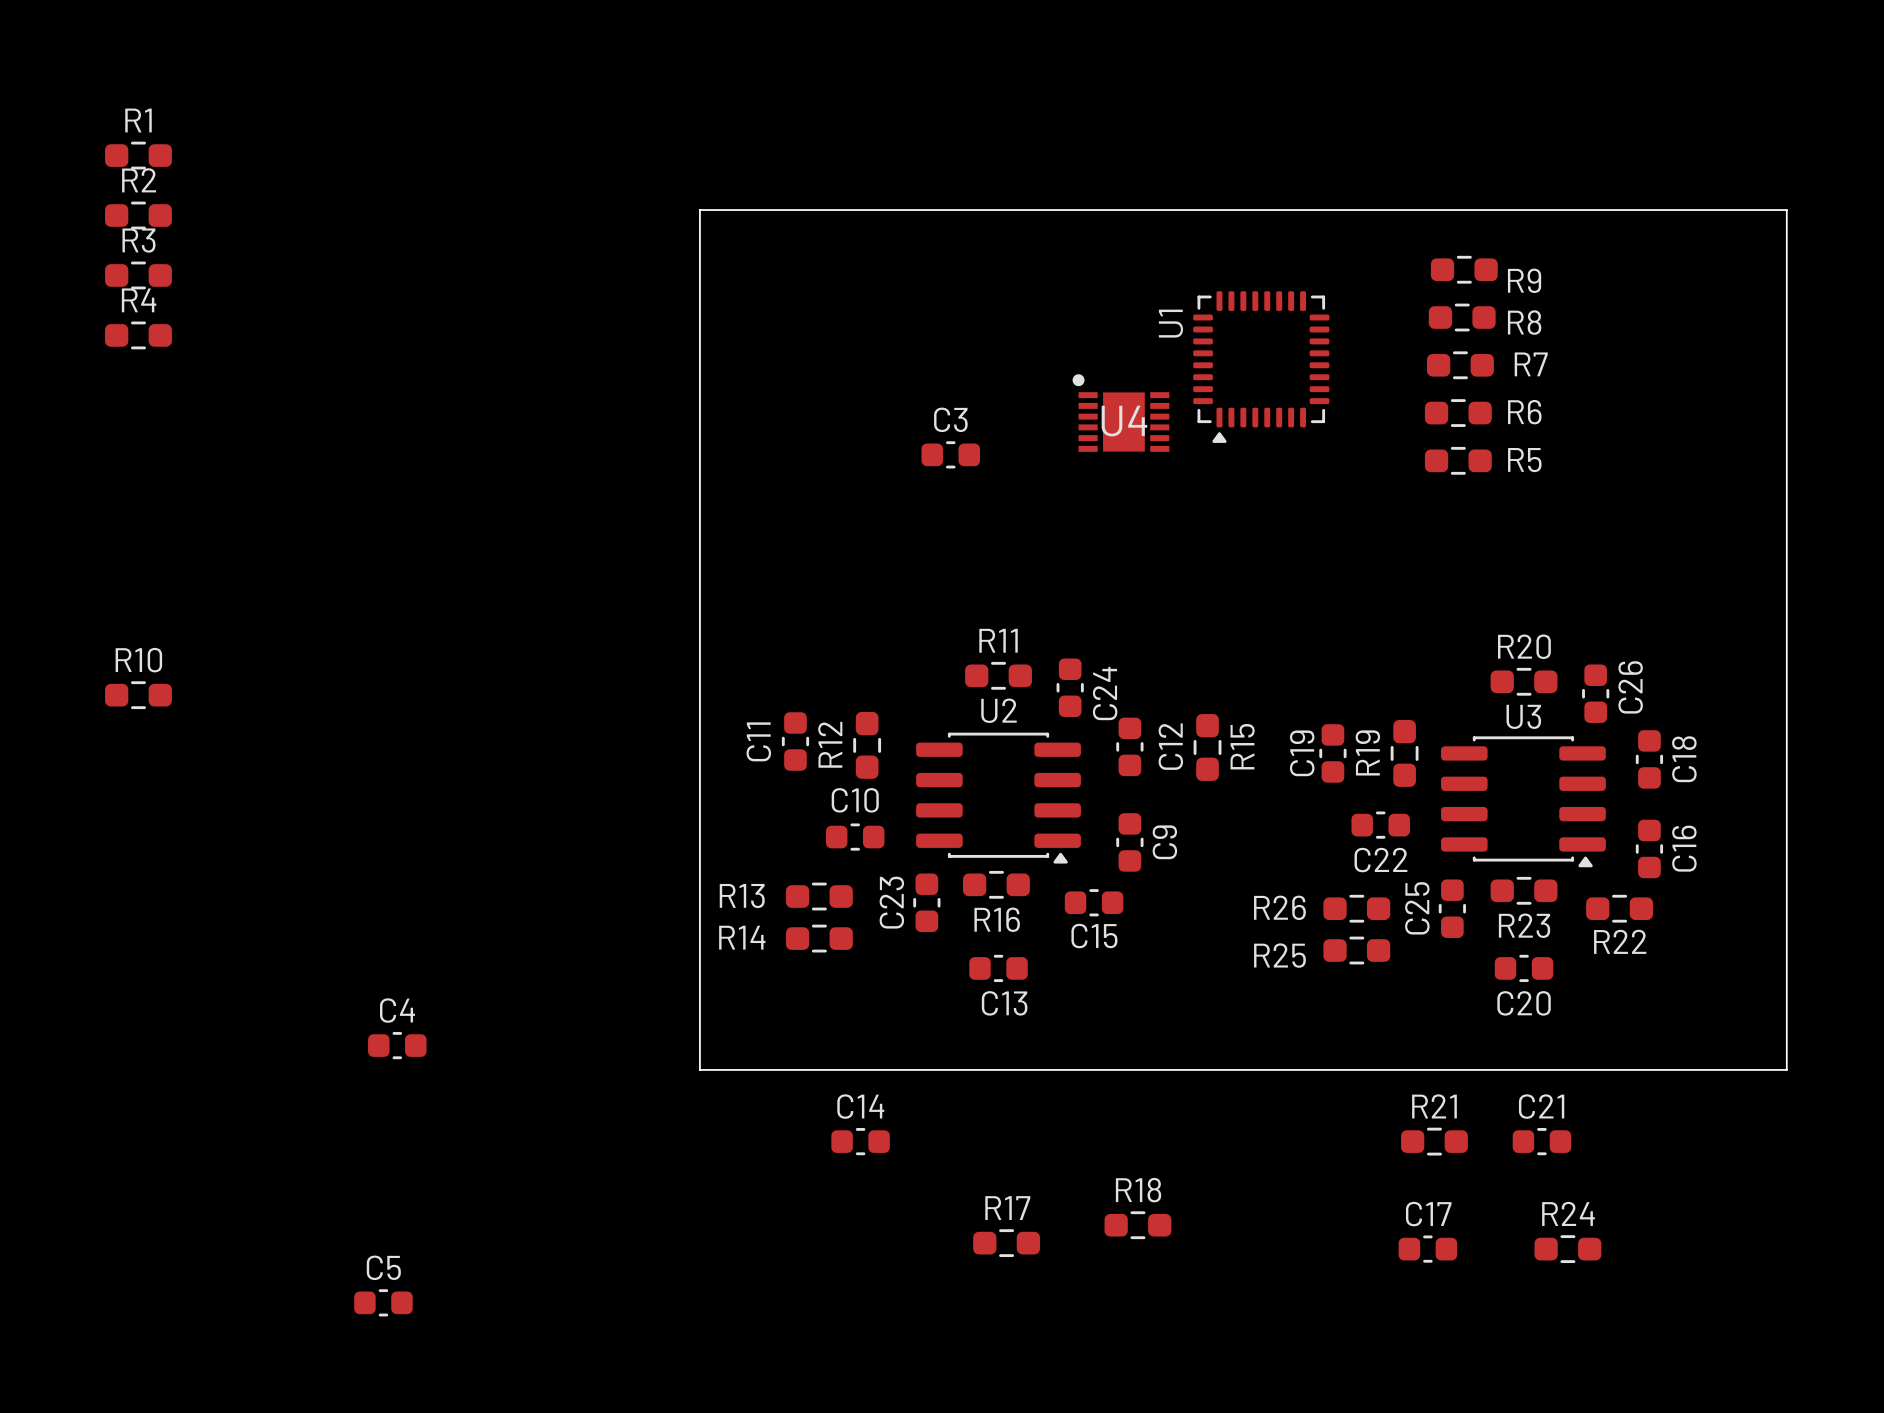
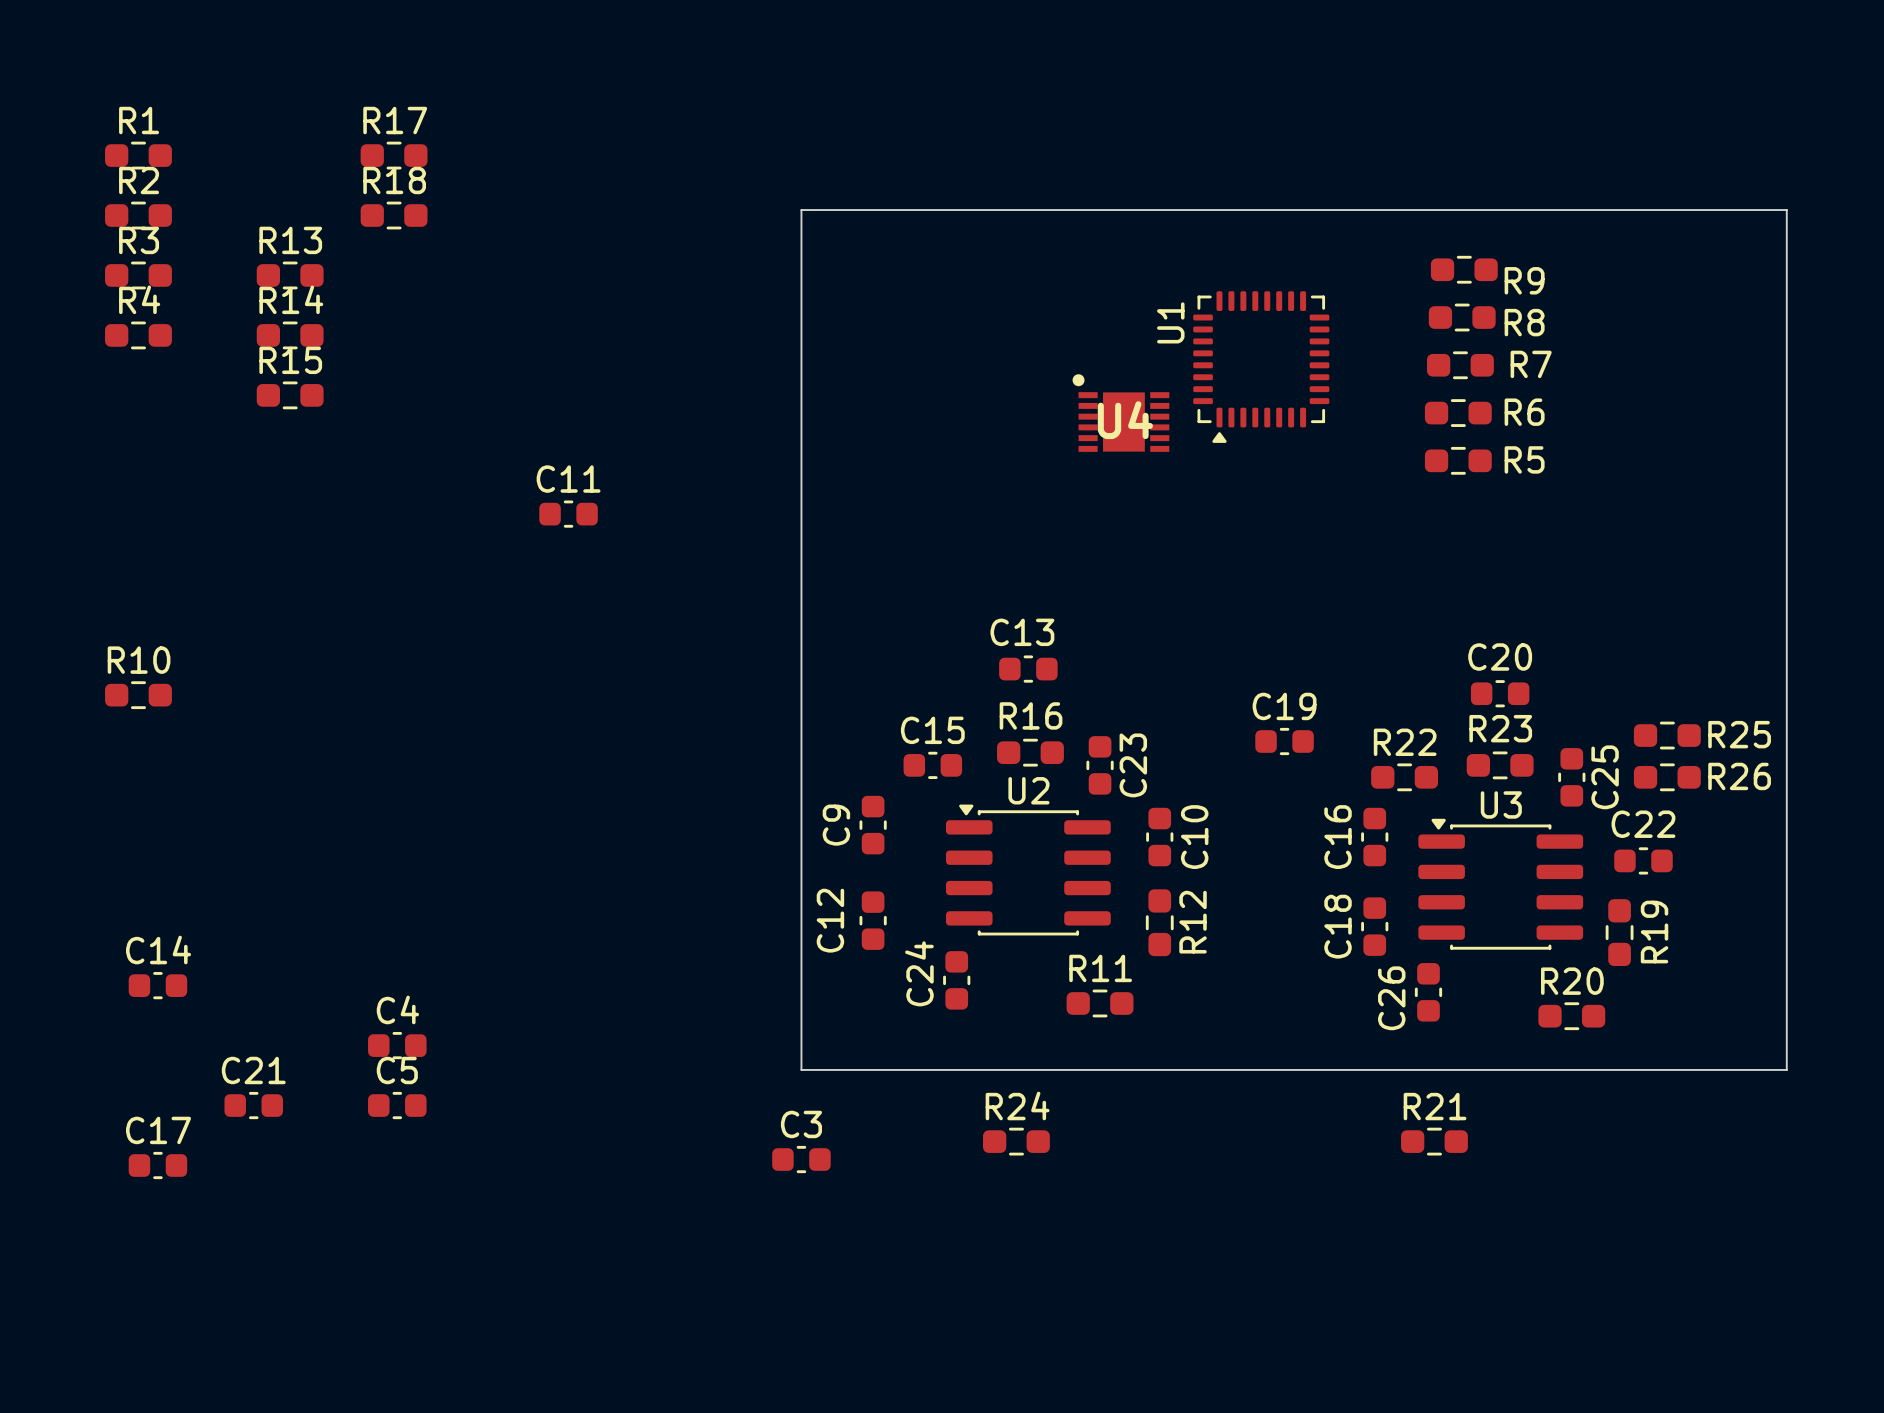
board edge: (801, 210) (699, 210) (699, 1069) (801, 1069) -> (801, 210) (801, 1069)
C3 position: (950, 454) -> (801, 1159)
R11 position: (998, 675) -> (1100, 1003)
R20 position: (1524, 681) -> (1571, 1016)
C24 position: (1070, 687) -> (956, 980)
C26 name position: C26 (1630, 687) -> C26 (1391, 998)
C24 name position: C24 (1105, 693) -> C24 (919, 973)
C26 position: (1595, 693) -> (1428, 992)
C11 rotation: 0° (795, 741) -> 90° clockwise (568, 514)
C11 position: (795, 741) -> (568, 514)
R12 name position: R12 (830, 744) -> R12 (1193, 922)
R12 position: (867, 745) -> (1159, 922)
C12 position: (1129, 746) -> (873, 920)
C12 name position: C12 (1170, 746) -> C12 (830, 920)
R15 name position: R15 (1242, 746) -> R15 (290, 360)
R15 rotation: 0° (1207, 747) -> 90° clockwise (290, 395)
R15 position: (1207, 747) -> (290, 395)
R19 name position: R19 (1367, 752) -> R19 (1654, 932)
C19 rotation: 0° (1332, 753) -> 90° clockwise (1284, 741)
C19 position: (1332, 753) -> (1284, 741)
R19 position: (1404, 753) -> (1619, 932)
C18 position: (1649, 759) -> (1374, 926)
C18 name position: C18 (1684, 759) -> C18 (1338, 926)
U2 rotation: 0° (998, 798) -> 180° (1028, 870)
U3 rotation: 0° (1523, 801) -> 180° (1500, 884)
C22 position: (1380, 825) -> (1643, 860)
C10 rotation: 0° (855, 837) -> 90° clockwise (1159, 837)
C10 position: (855, 837) -> (1159, 837)
C9 position: (1129, 842) -> (873, 825)
C9 name position: C9 (1164, 842) -> C9 (836, 825)
C16 position: (1649, 848) -> (1374, 837)
C16 name position: C16 (1684, 848) -> C16 (1338, 837)
C22 name position: C22 (1380, 860) -> C22 (1643, 824)
R16 position: (996, 884) -> (1030, 752)
R23 position: (1524, 890) -> (1500, 765)
R13 name position: R13 (742, 896) -> R13 (290, 240)
R13 position: (819, 896) -> (290, 275)
C23 name position: C23 (891, 902) -> C23 (1133, 765)
C23 position: (926, 902) -> (1100, 765)
C15 position: (1094, 902) -> (932, 765)
R26 name position: R26 (1279, 907) -> R26 (1739, 776)
R26 position: (1356, 908) -> (1667, 777)
C25 name position: C25 (1417, 908) -> C25 (1605, 777)
C25 position: (1452, 908) -> (1571, 777)
R22 position: (1619, 908) -> (1404, 777)
R16 name position: R16 (997, 919) -> R16 (1031, 715)
R23 name position: R23 (1524, 925) -> R23 (1500, 728)
C15 name position: C15 (1094, 936) -> C15 (932, 730)
R14 name position: R14 (742, 937) -> R14 (291, 299)
R14 position: (819, 938) -> (290, 335)
R22 name position: R22 (1620, 941) -> R22 (1405, 742)
R25 position: (1356, 950) -> (1667, 735)
R25 name position: R25 (1279, 955) -> R25 (1739, 734)
C13 position: (998, 968) -> (1028, 669)
C20 position: (1524, 968) -> (1500, 693)
C13 name position: C13 (1004, 1003) -> C13 (1022, 632)
C20 name position: C20 (1524, 1003) -> C20 (1500, 657)
C14 position: (860, 1141) -> (157, 985)
C21 position: (1541, 1141) -> (253, 1105)
R18 position: (1137, 1225) -> (394, 215)
R17 position: (1006, 1243) -> (394, 155)
C17 position: (1427, 1249) -> (157, 1165)
R24 position: (1567, 1249) -> (1016, 1141)
C5 position: (383, 1302) -> (397, 1105)

